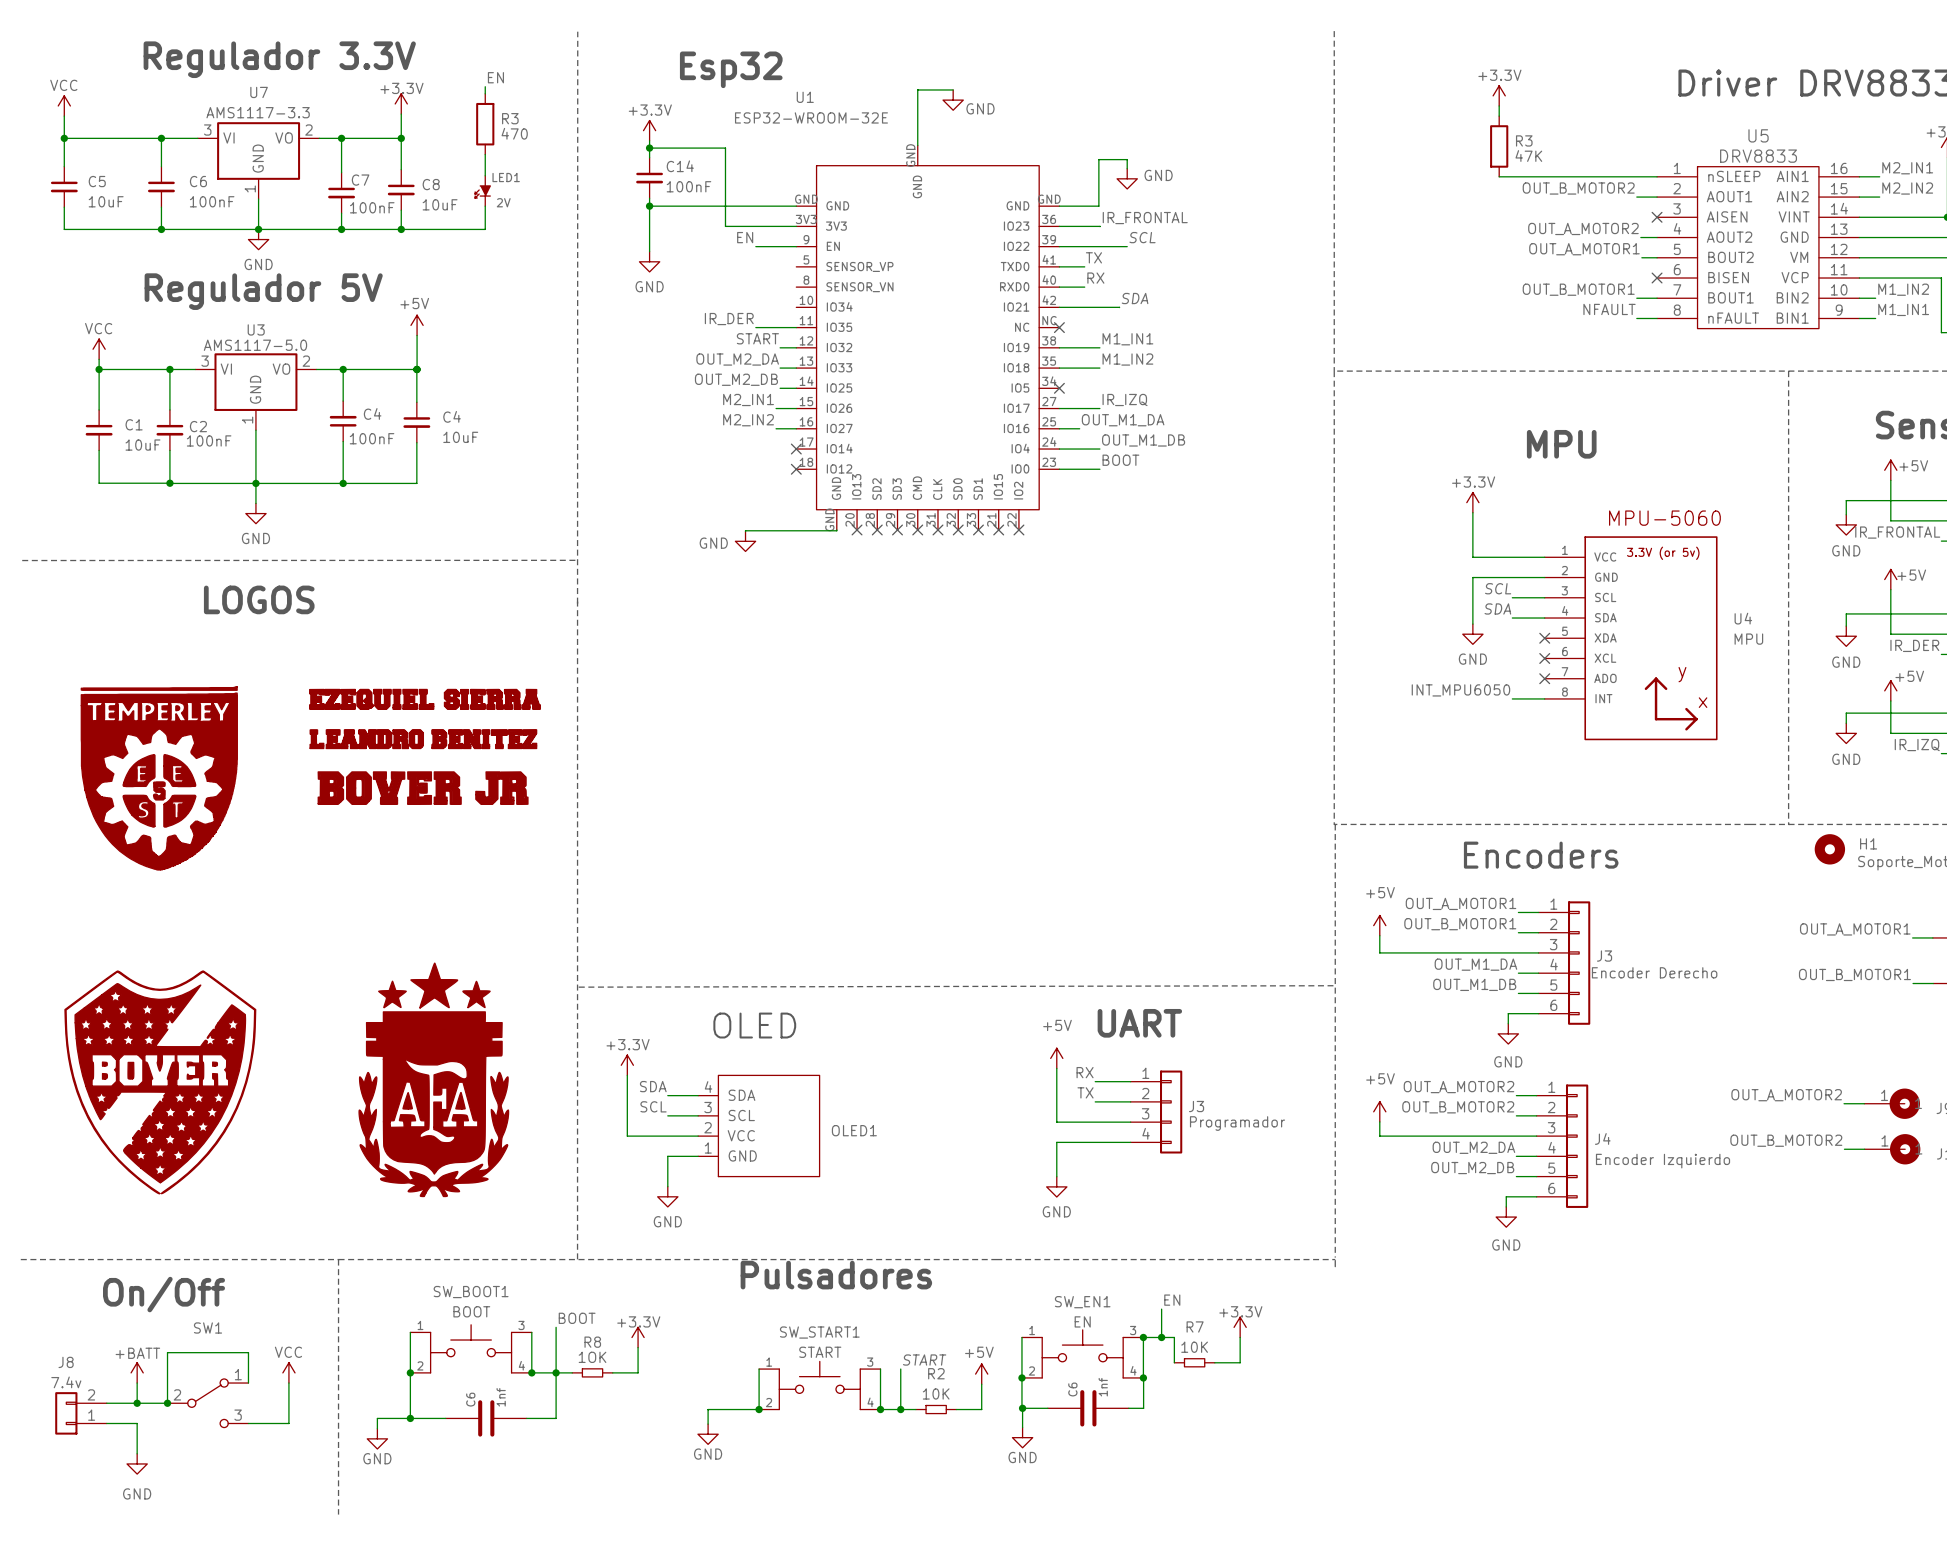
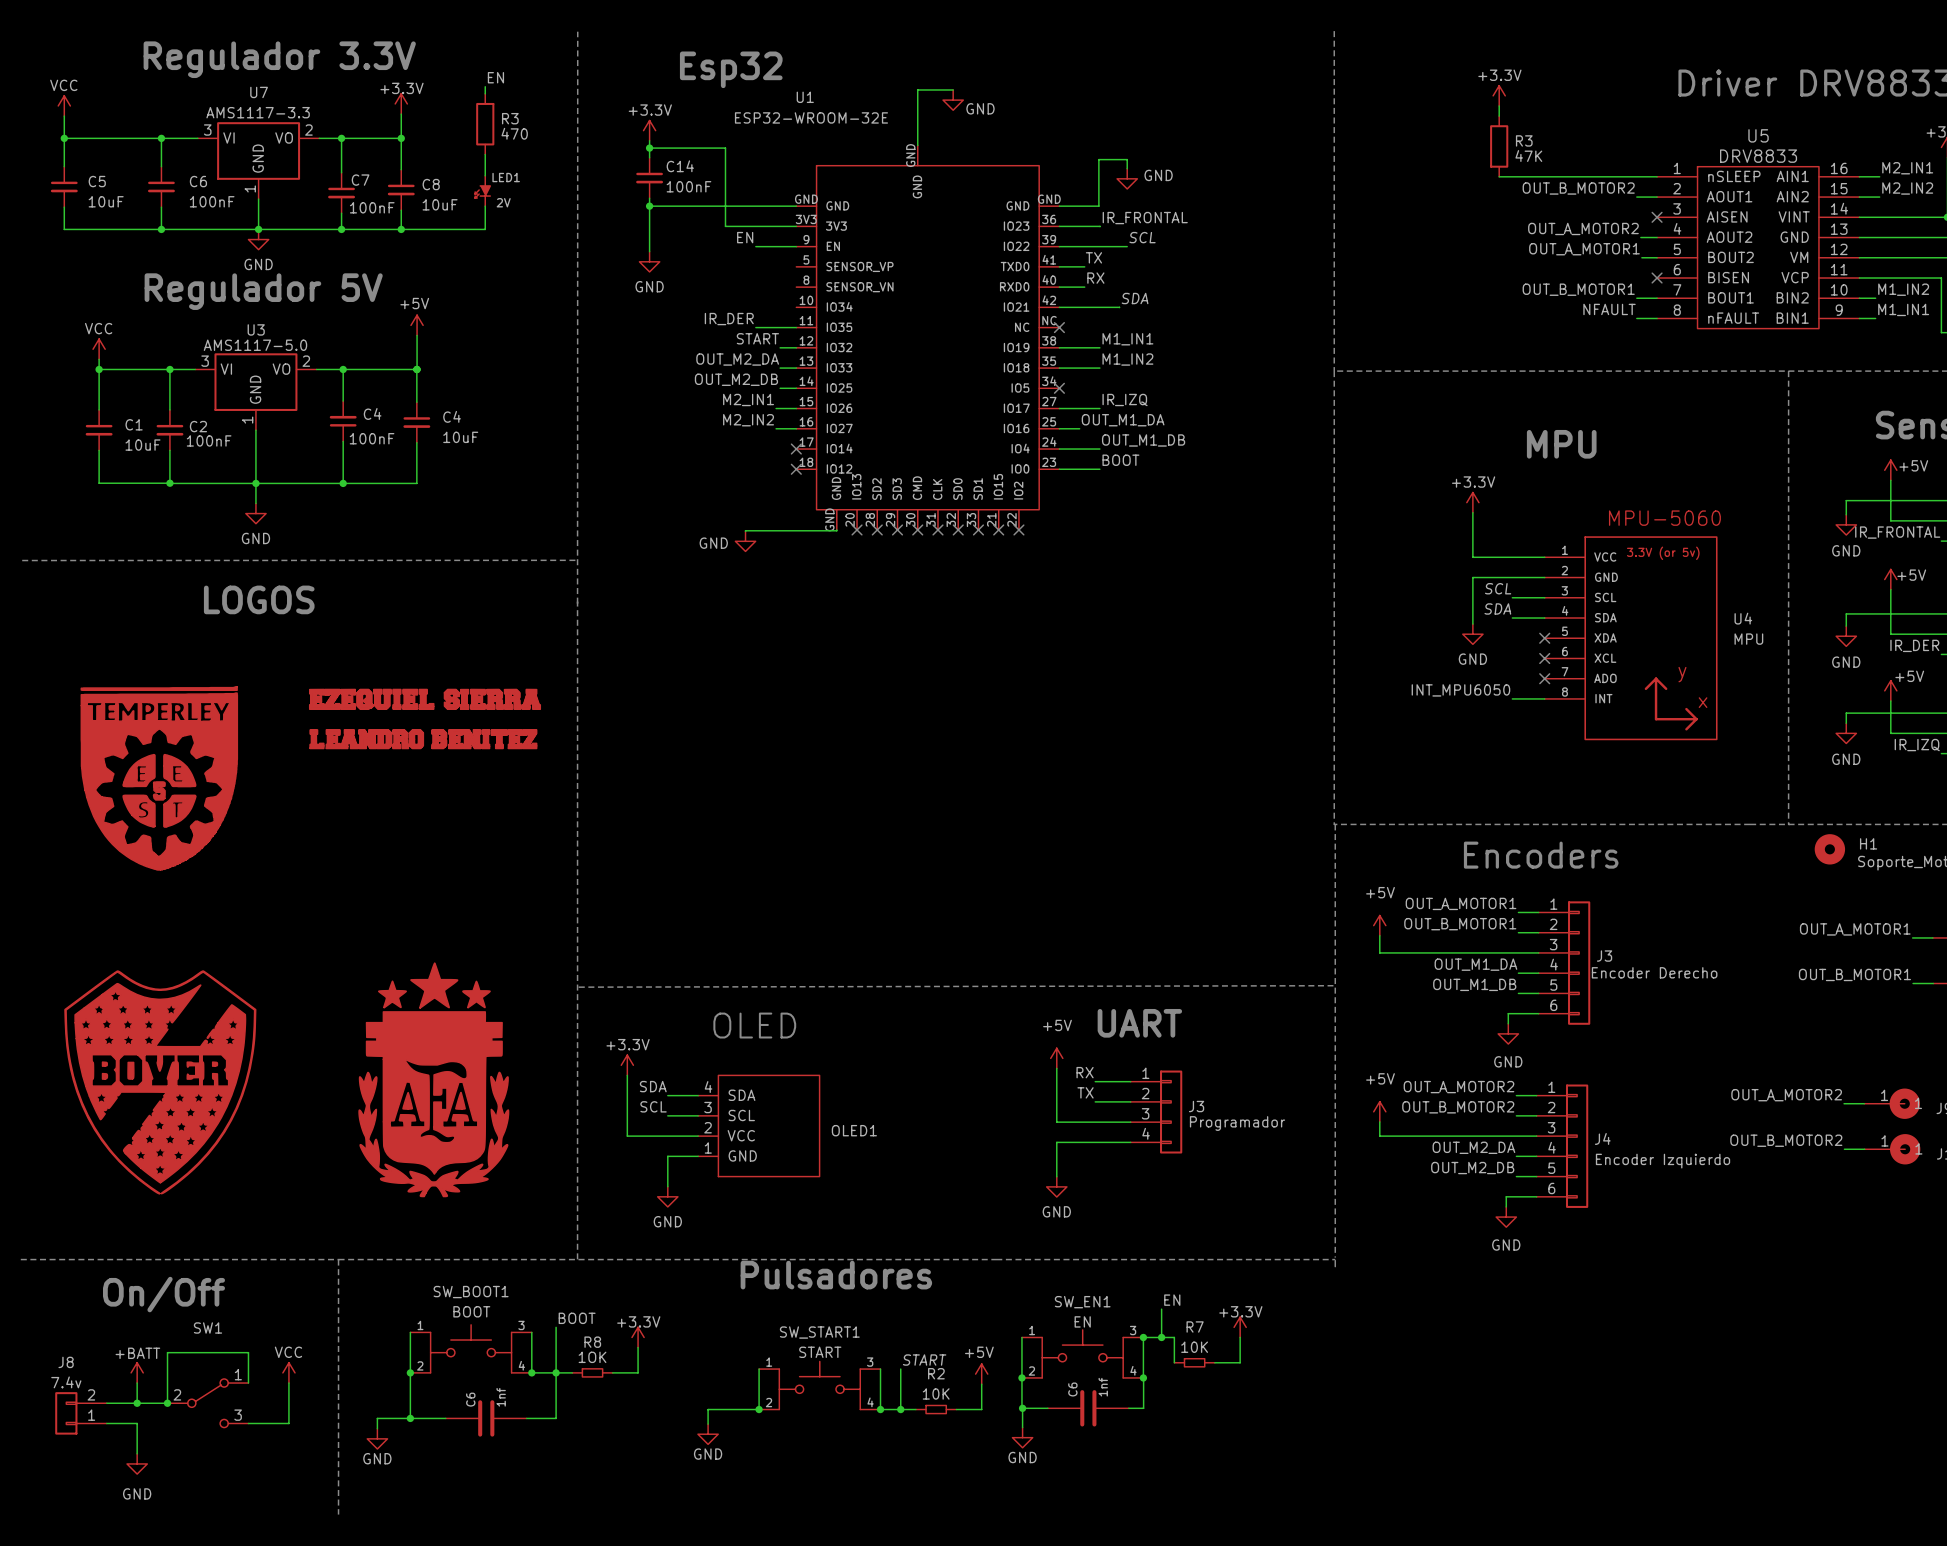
part: (423, 788) -> none

